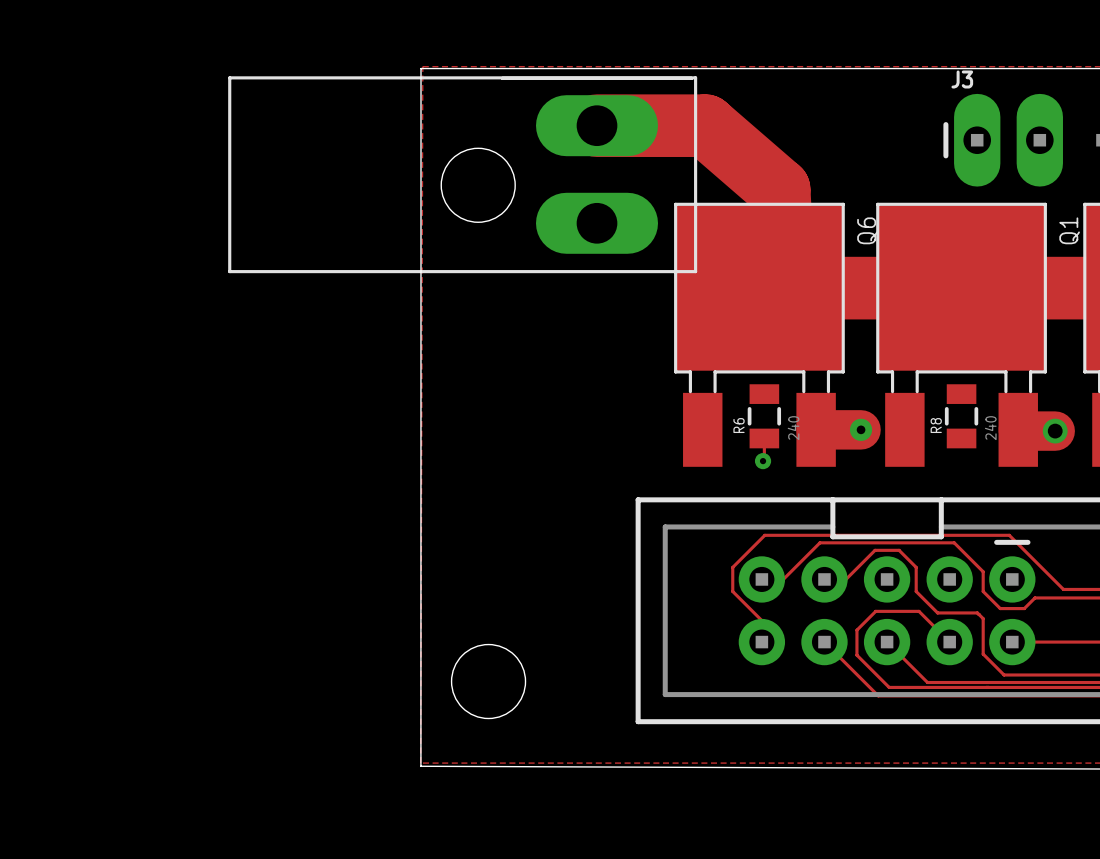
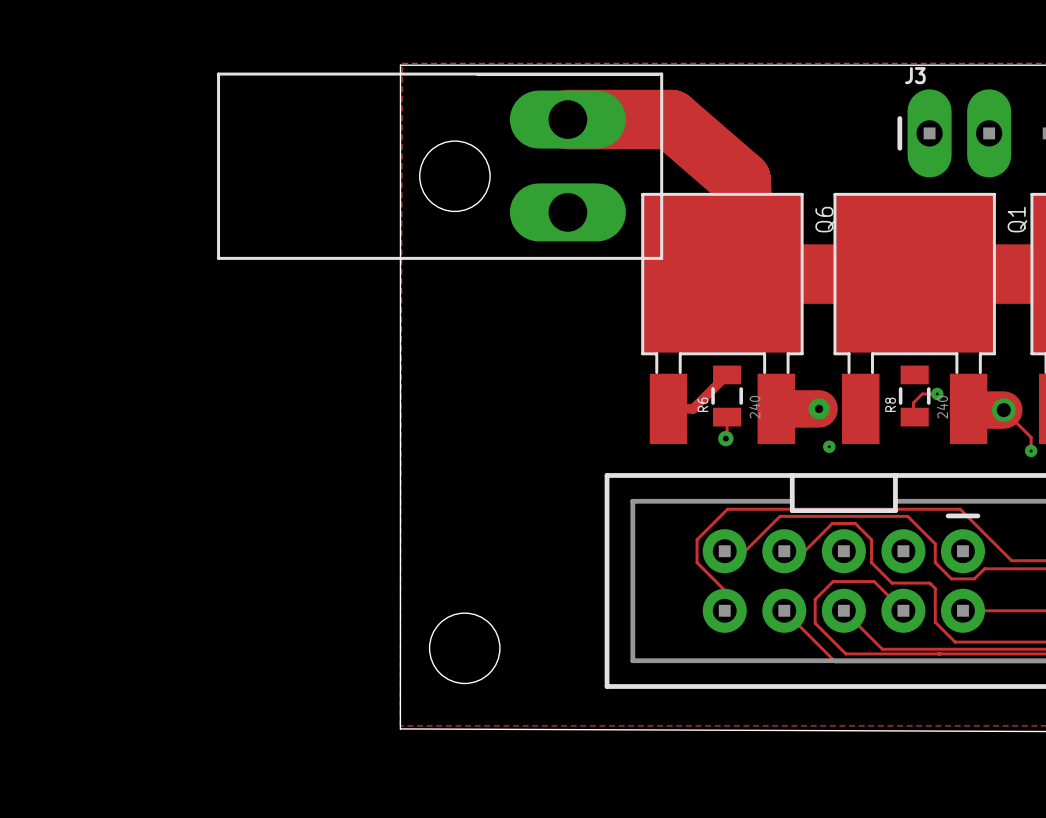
track: none -> (727, 374) (693, 408) (668, 408)
track: none -> (937, 393) (922, 393) (913, 402) (913, 415) (911, 417)
via: none -> (937, 393)
track: none -> (1003, 410) (1031, 437) (1031, 450)
via: none -> (829, 446)
via: none -> (1031, 450)

